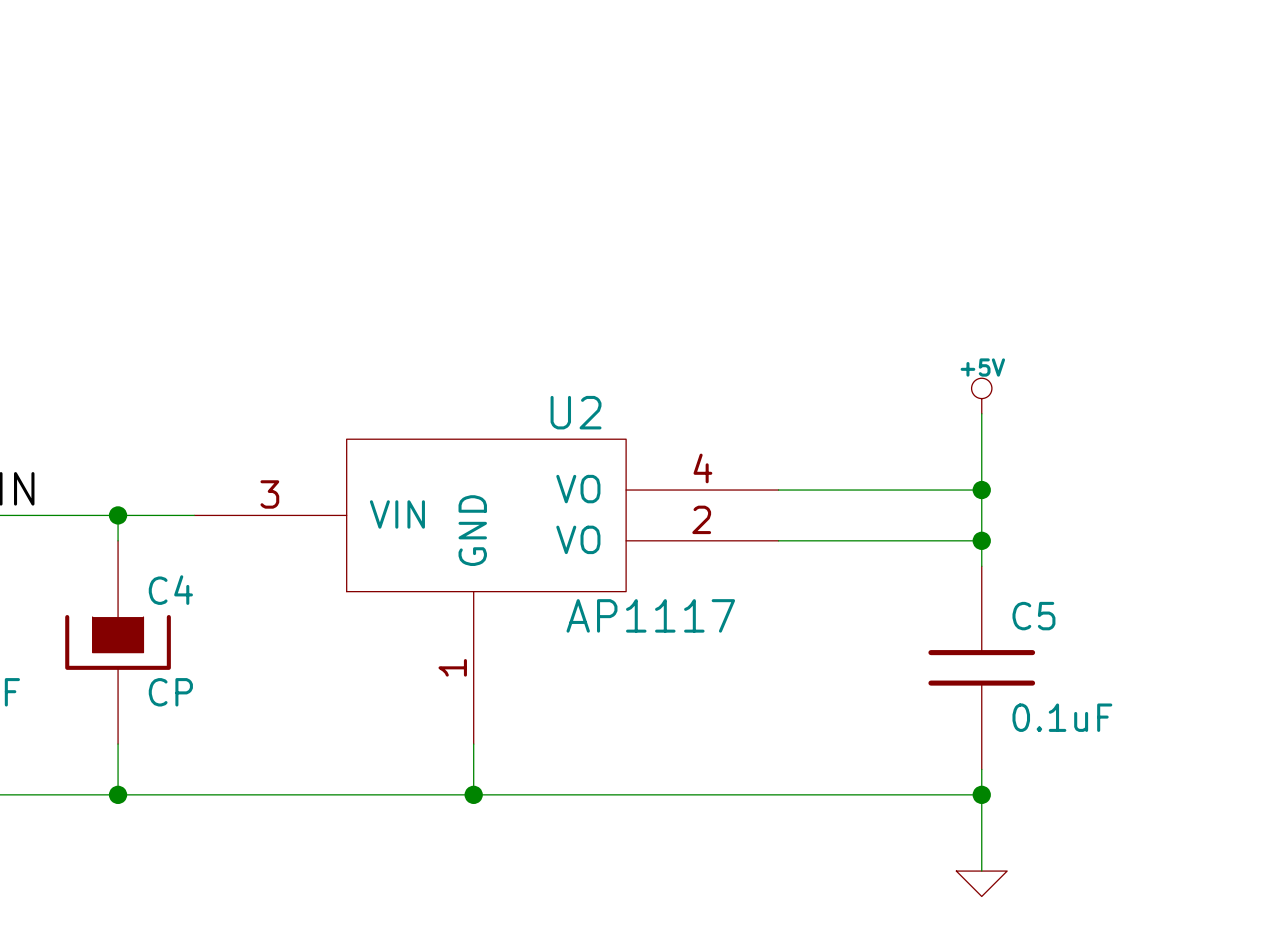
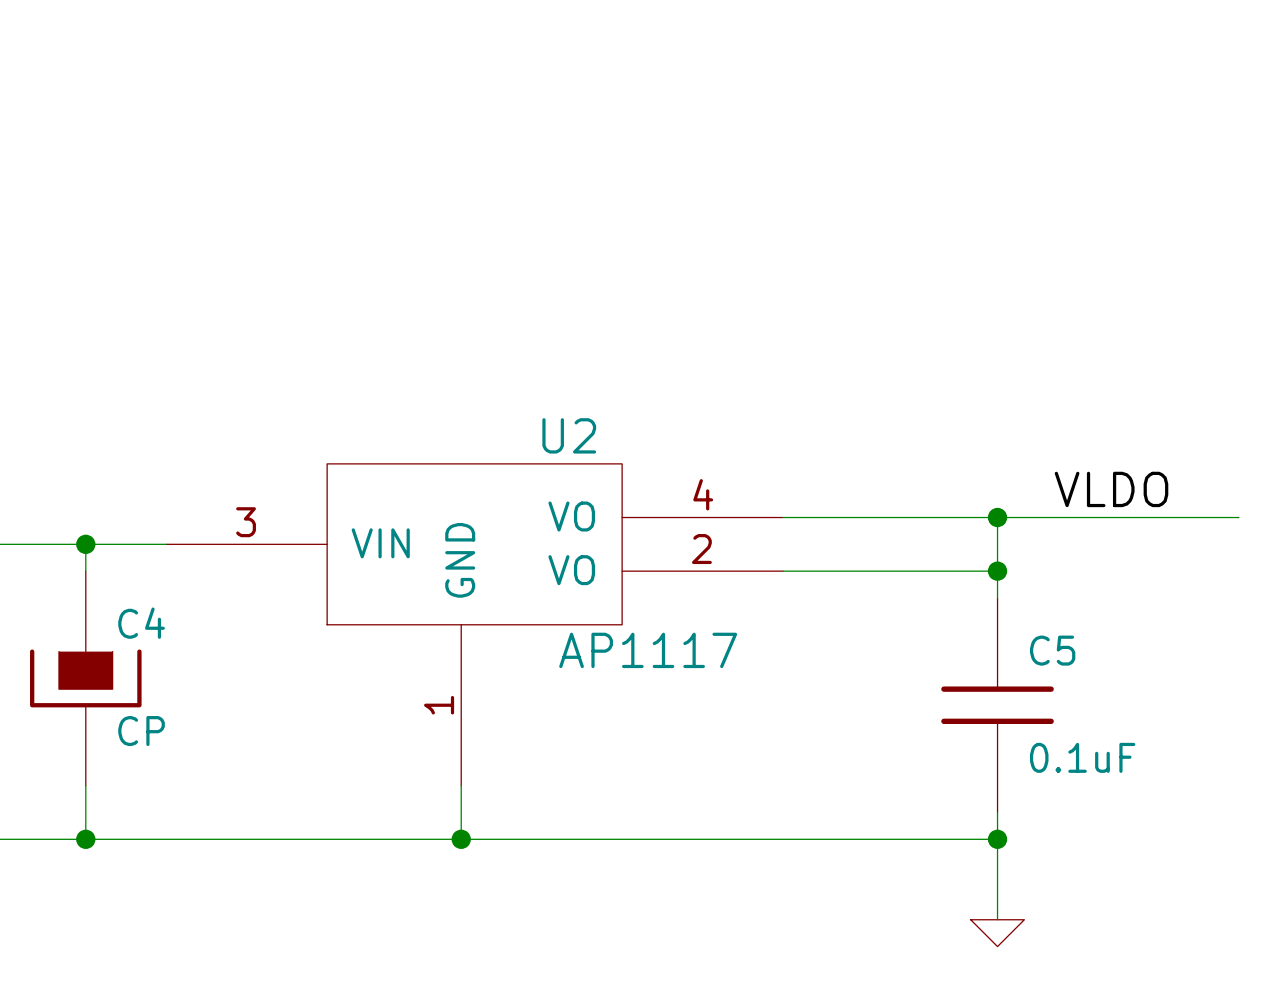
power symbol: +5V (981, 396) -> none
wire: (981, 413) (981, 490) -> (1238, 517) (997, 517)
label: none -> VLDO (1111, 489)

